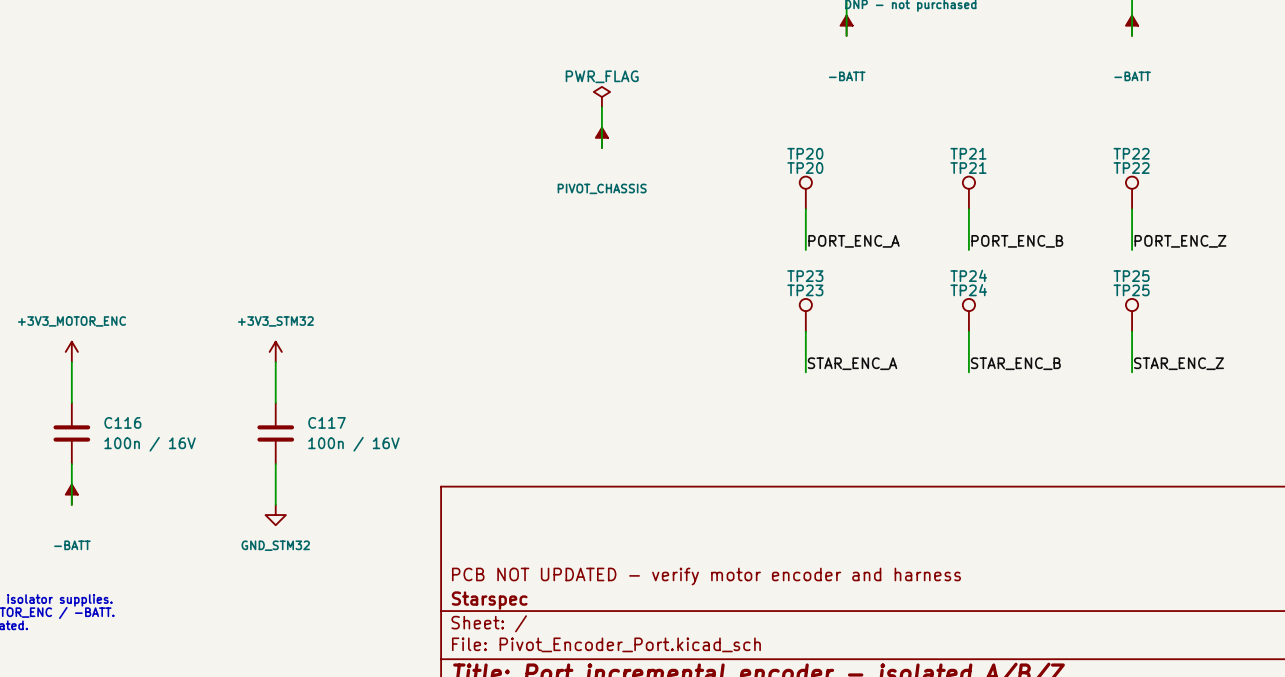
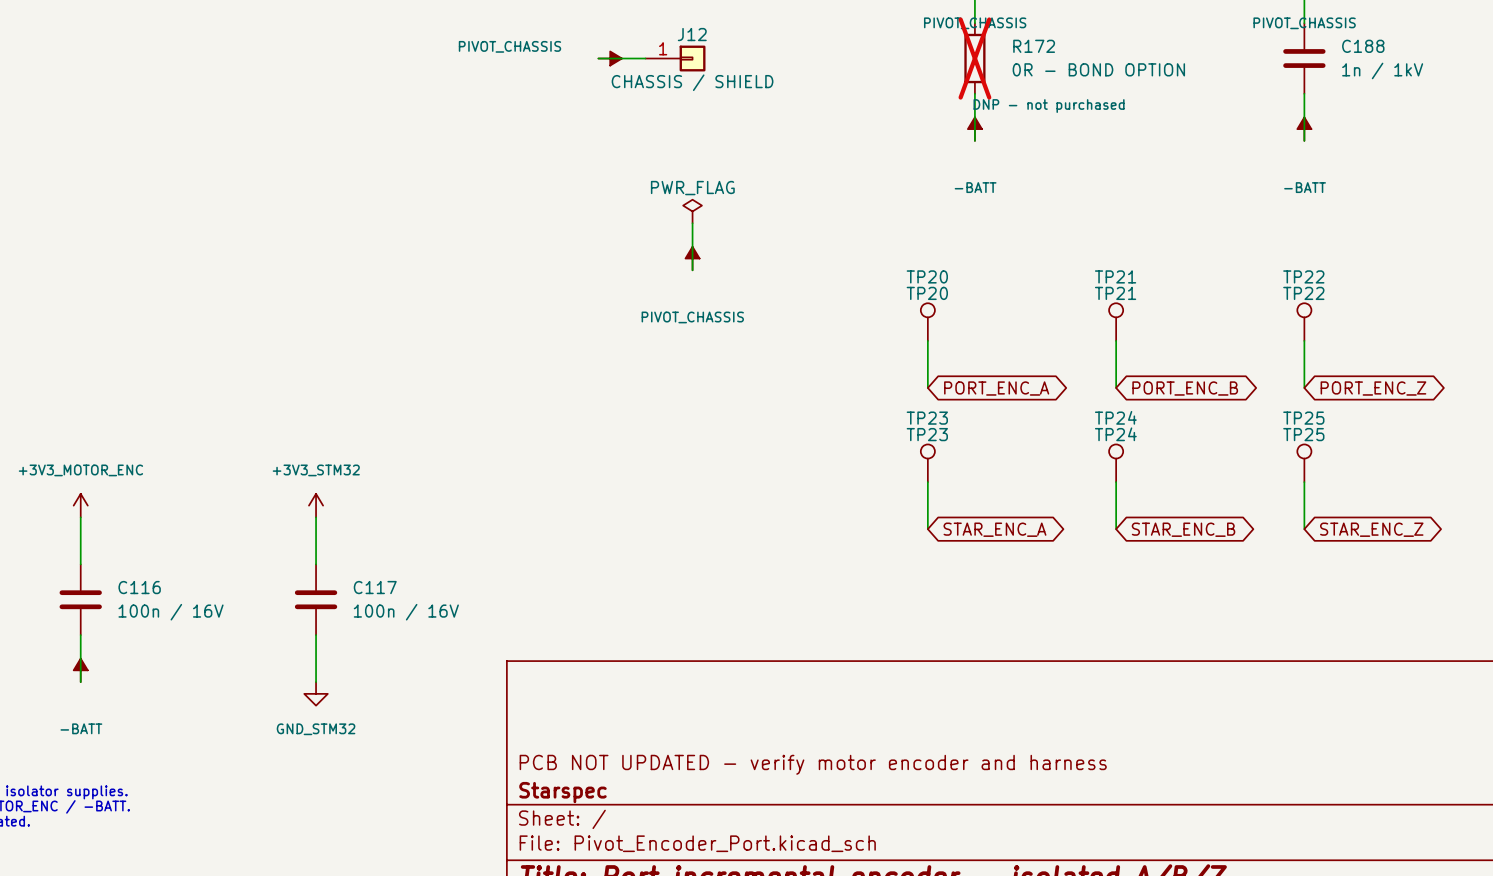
label: PORT_ENC_A (853, 241) -> none
label: PORT_ENC_B (1017, 241) -> none
label: PORT_ENC_Z (1180, 241) -> none
global label: none -> PORT_ENC_A (996, 388)
global label: none -> PORT_ENC_B (1185, 388)
global label: none -> PORT_ENC_Z (1373, 388)
label: STAR_ENC_A (852, 363) -> none
label: STAR_ENC_B (1015, 363) -> none
label: STAR_ENC_Z (1178, 363) -> none
global label: none -> STAR_ENC_A (994, 529)
global label: none -> STAR_ENC_B (1183, 529)
global label: none -> STAR_ENC_Z (1371, 529)

